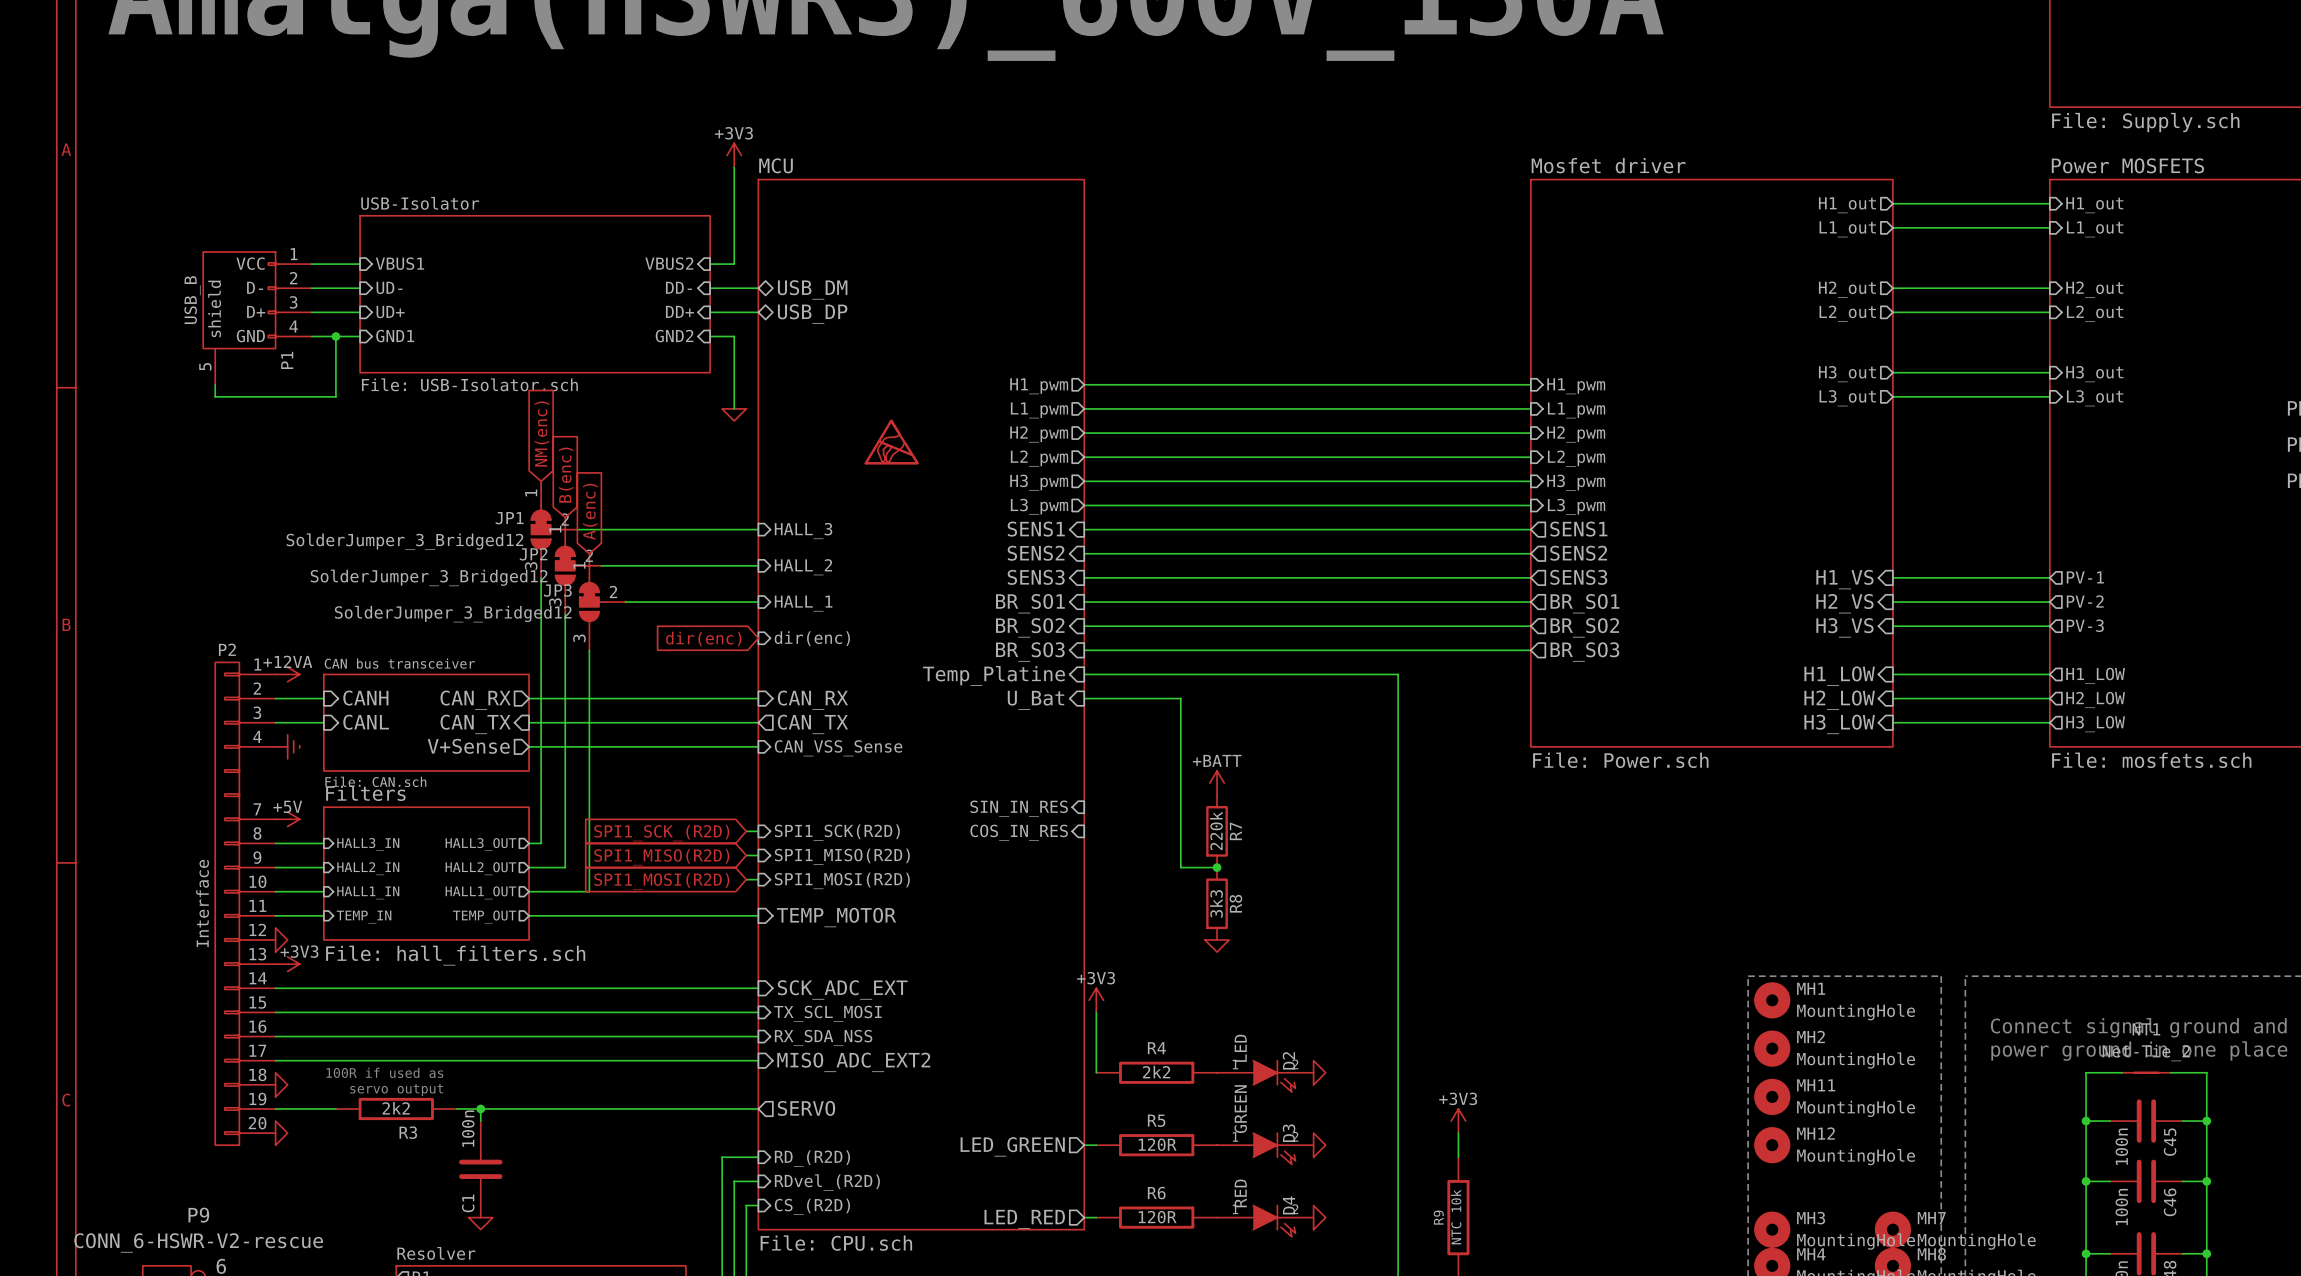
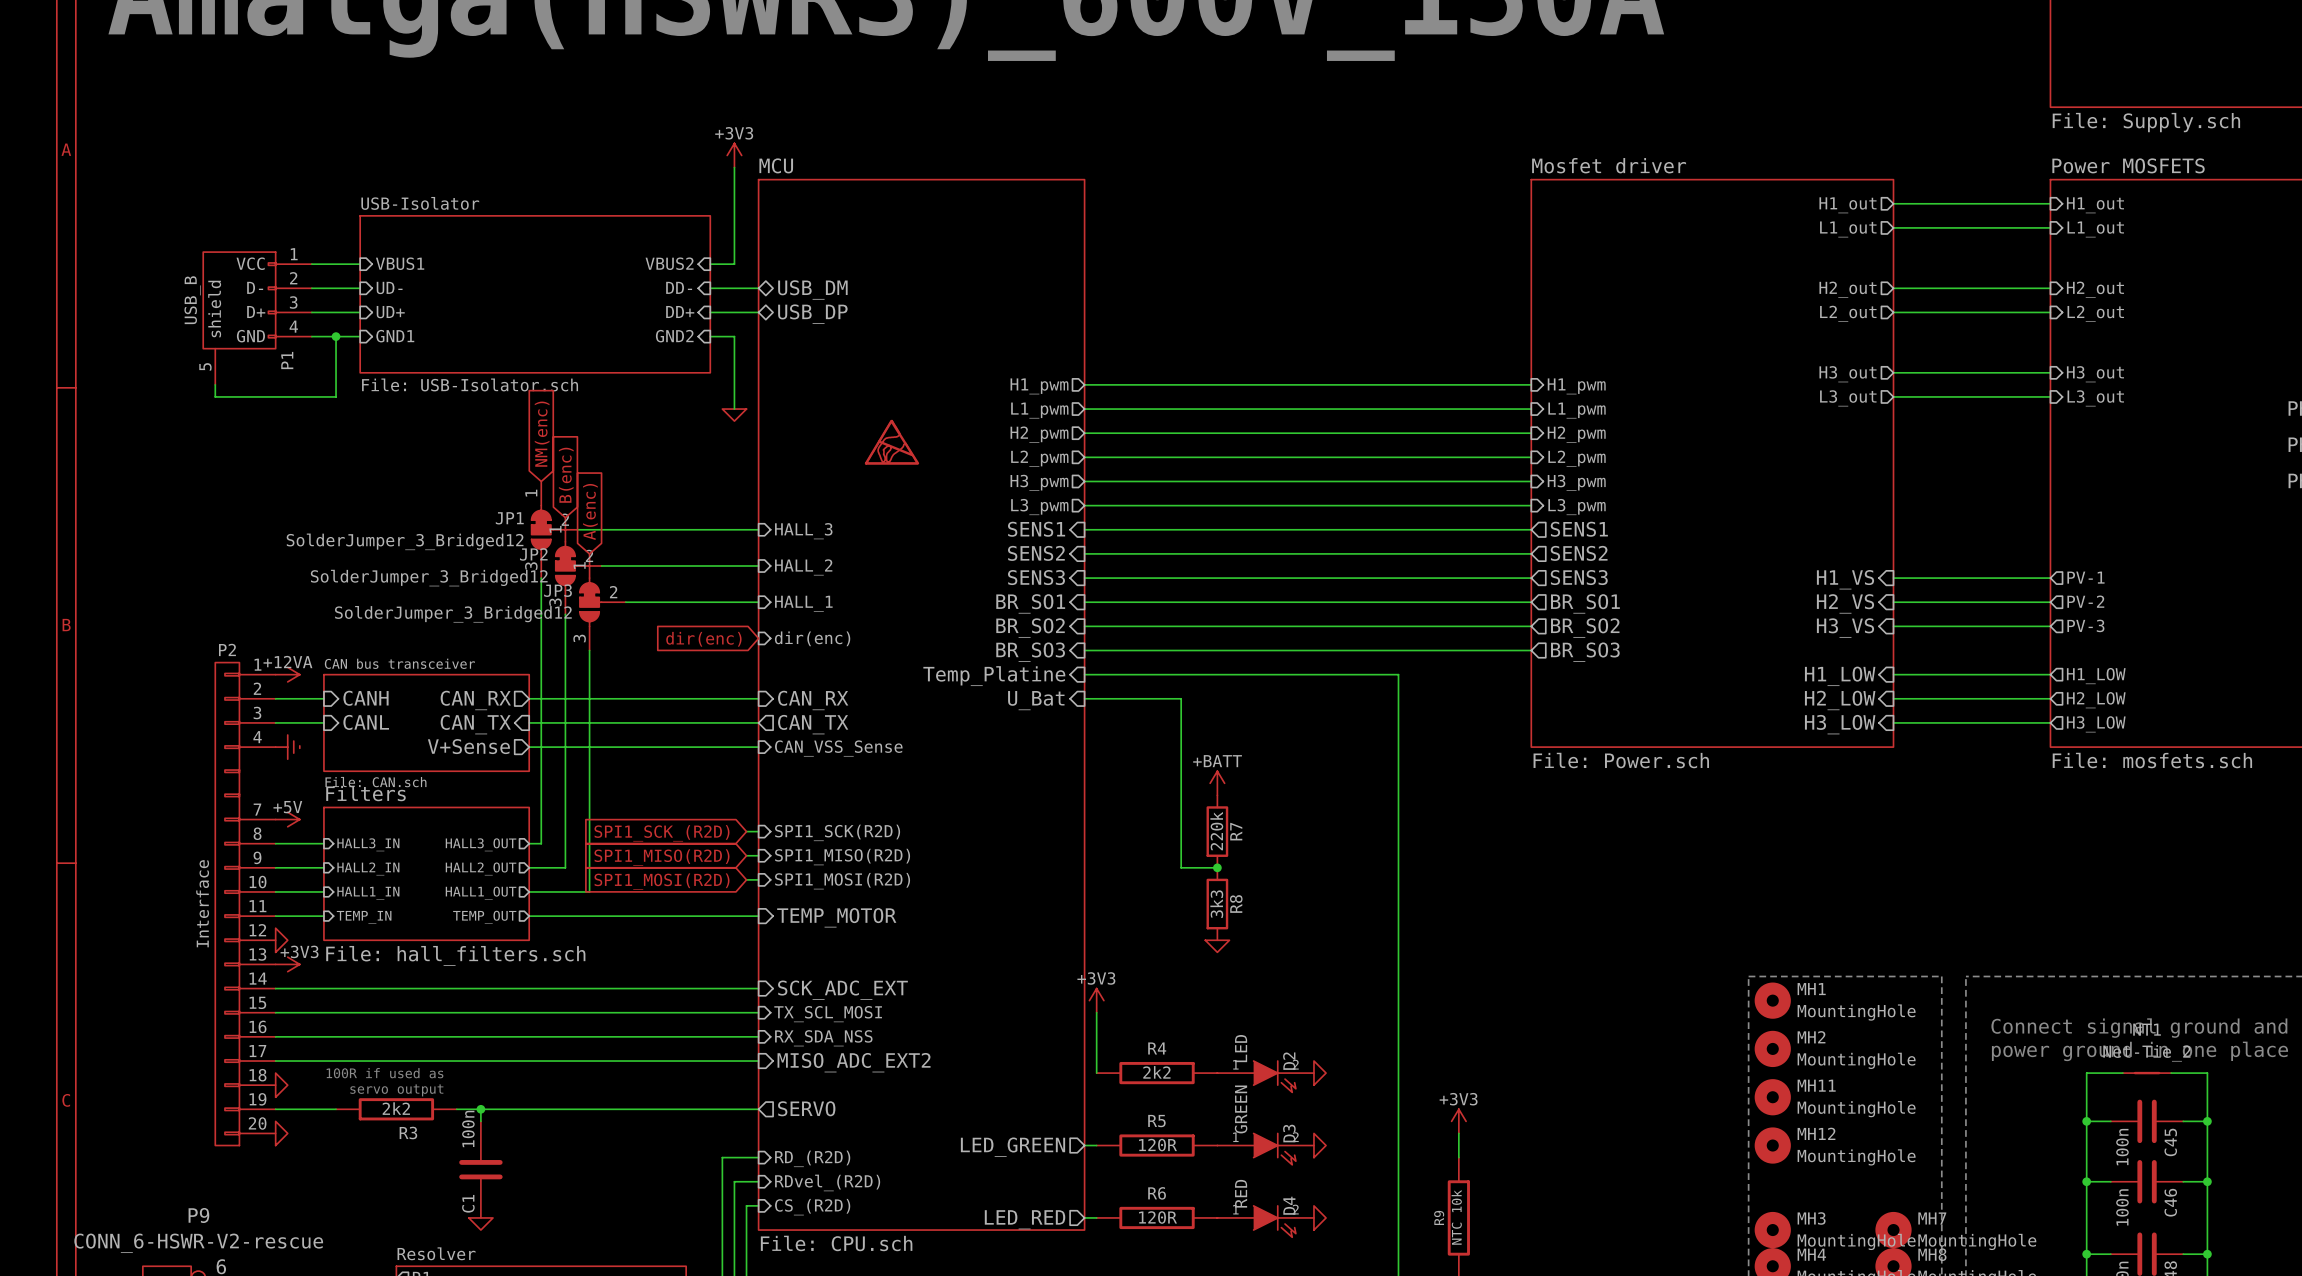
sheet pin: SIN_IN_RES (1019, 808) -> none
sheet pin: COS_IN_RES (1019, 832) -> none

